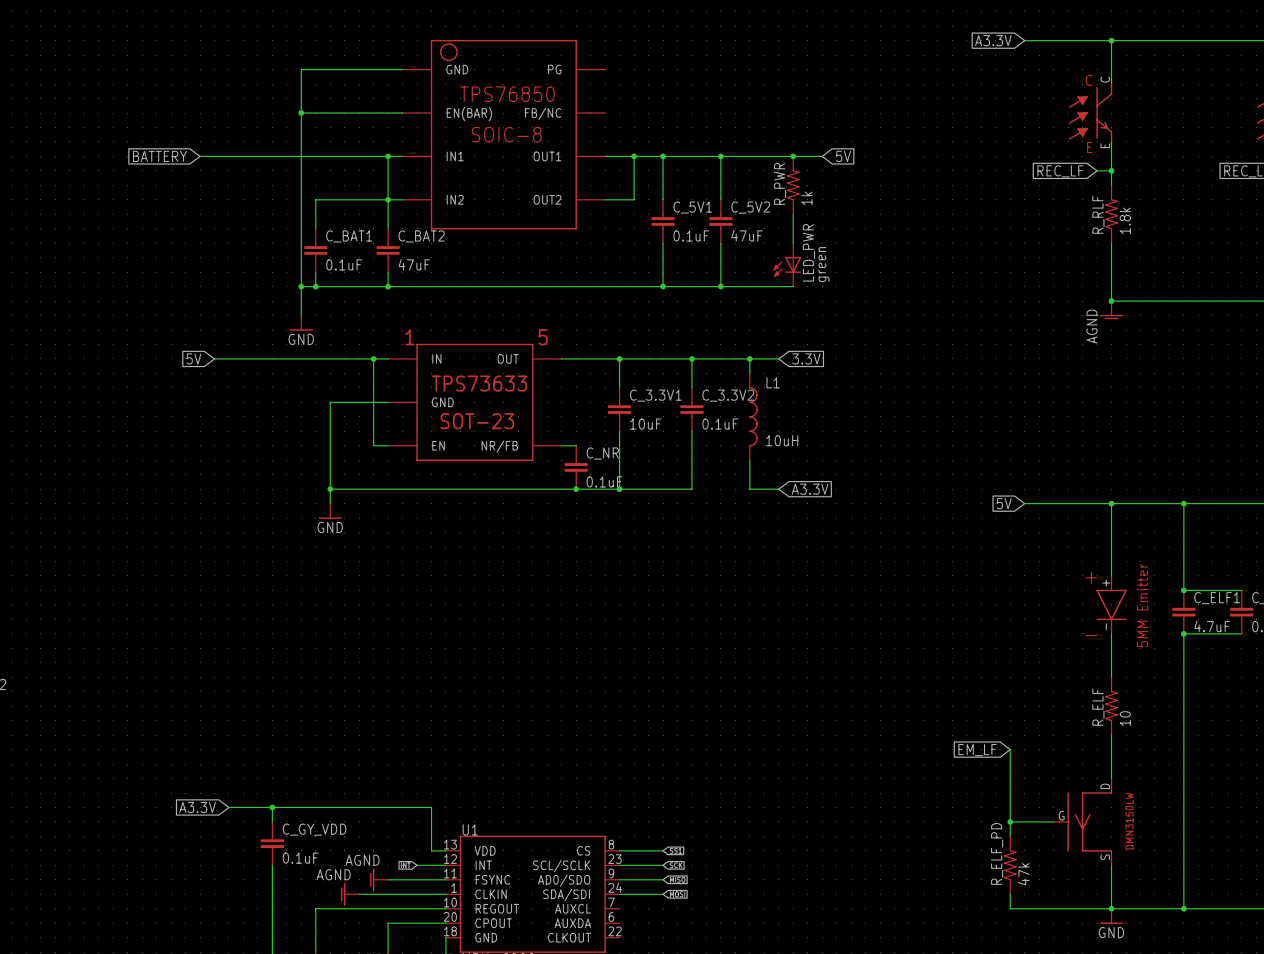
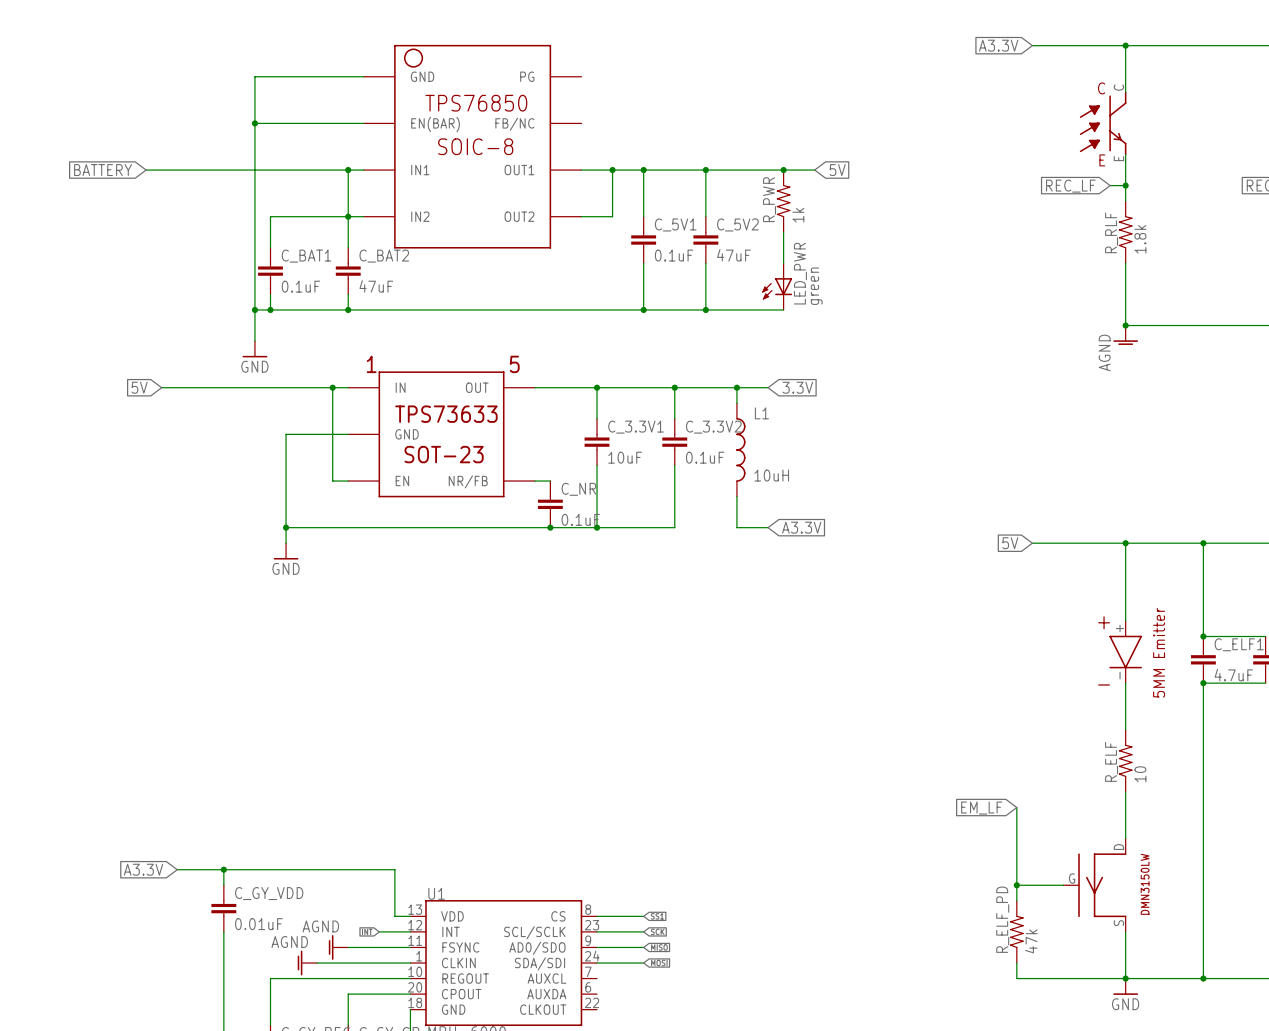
C_GY_VDD value: 0.1uF (300, 858) -> 0.01uF (258, 924)

